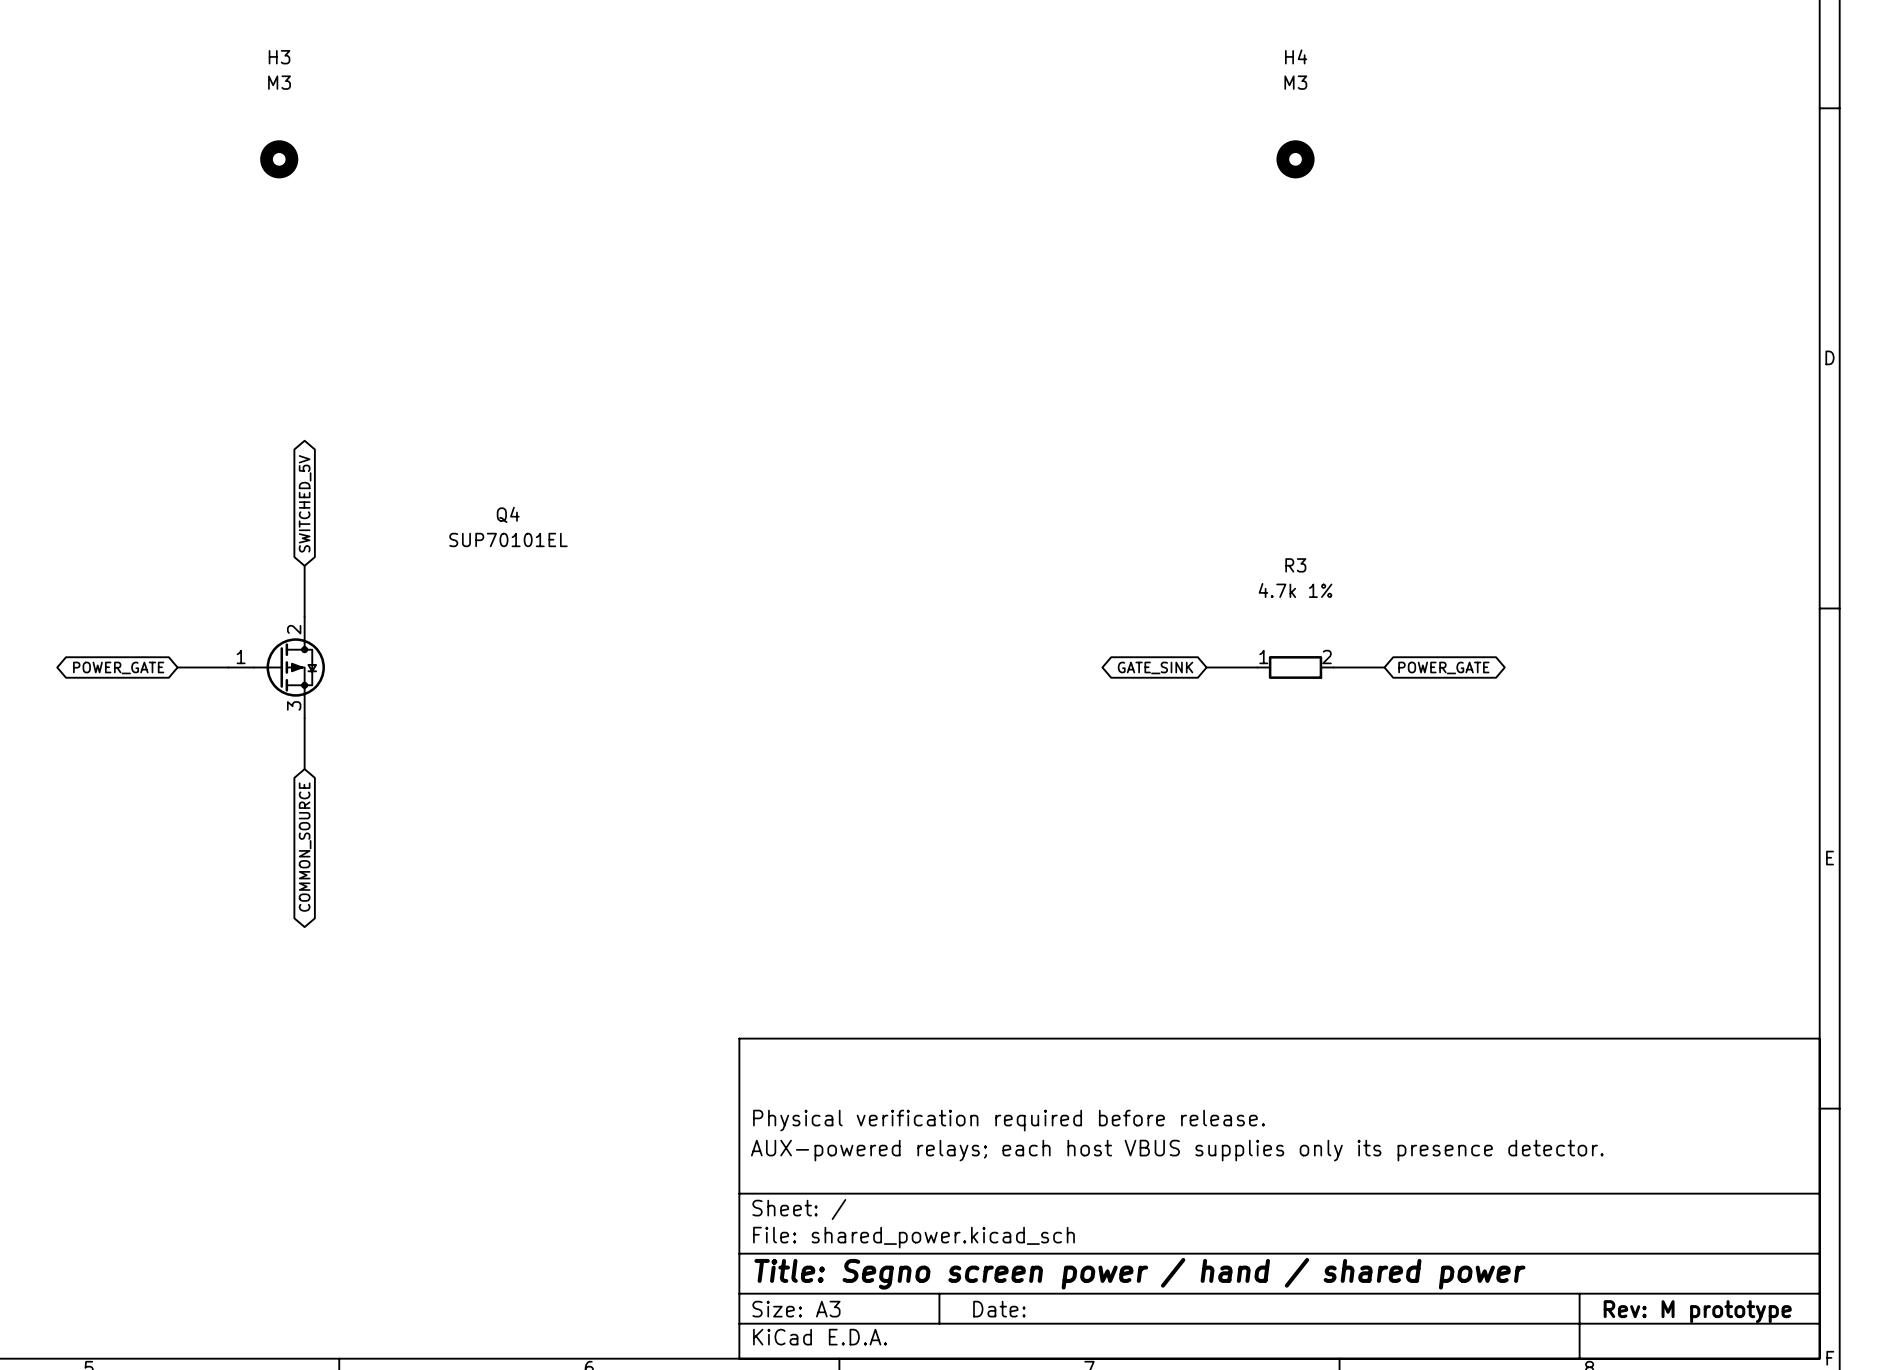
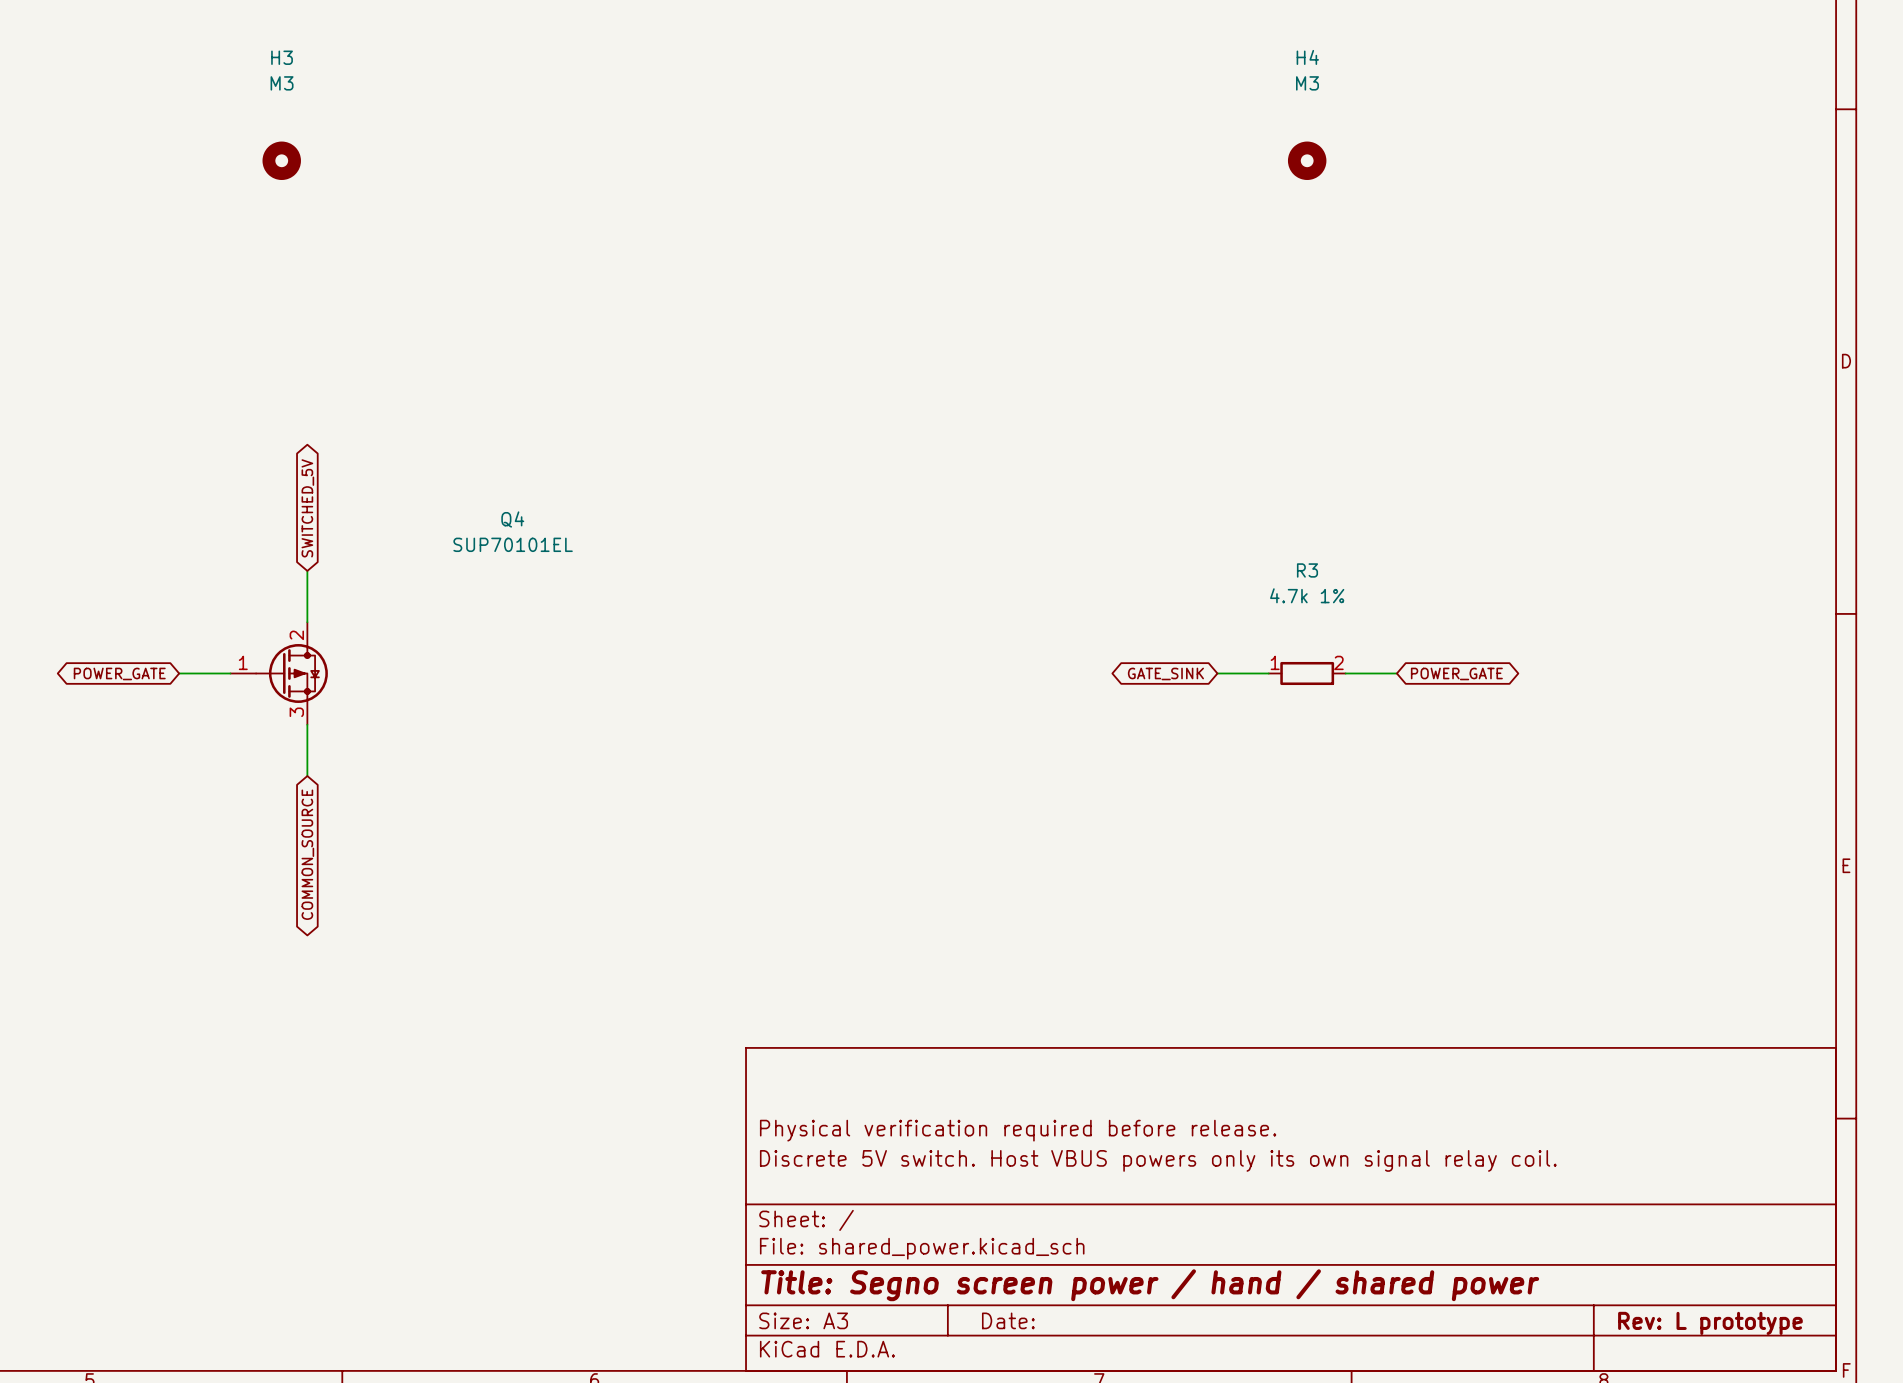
title block: AUX-powered relays; each host VBUS supplies only its presence detector. (1177, 1150) -> Discrete 5V switch. Host VBUS powers only its own signal relay coil. (1158, 1160)
title block: Rev: M prototype (1697, 1311) -> Rev: L prototype (1710, 1323)

